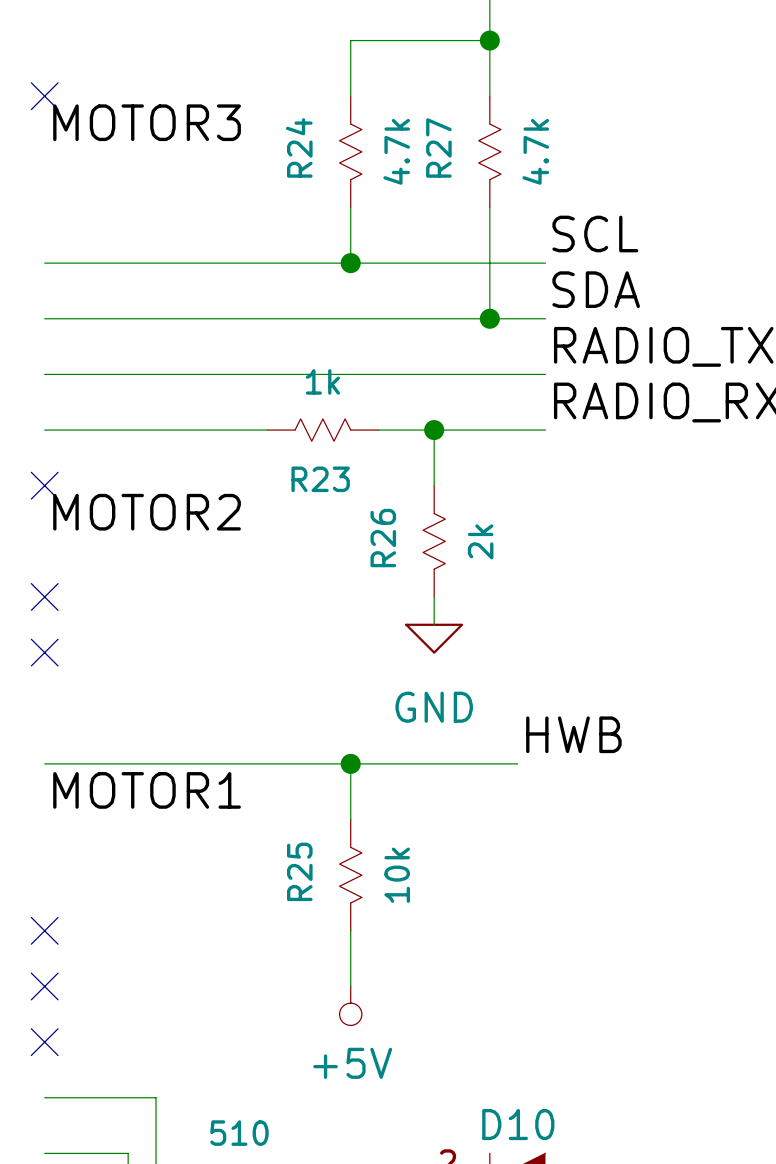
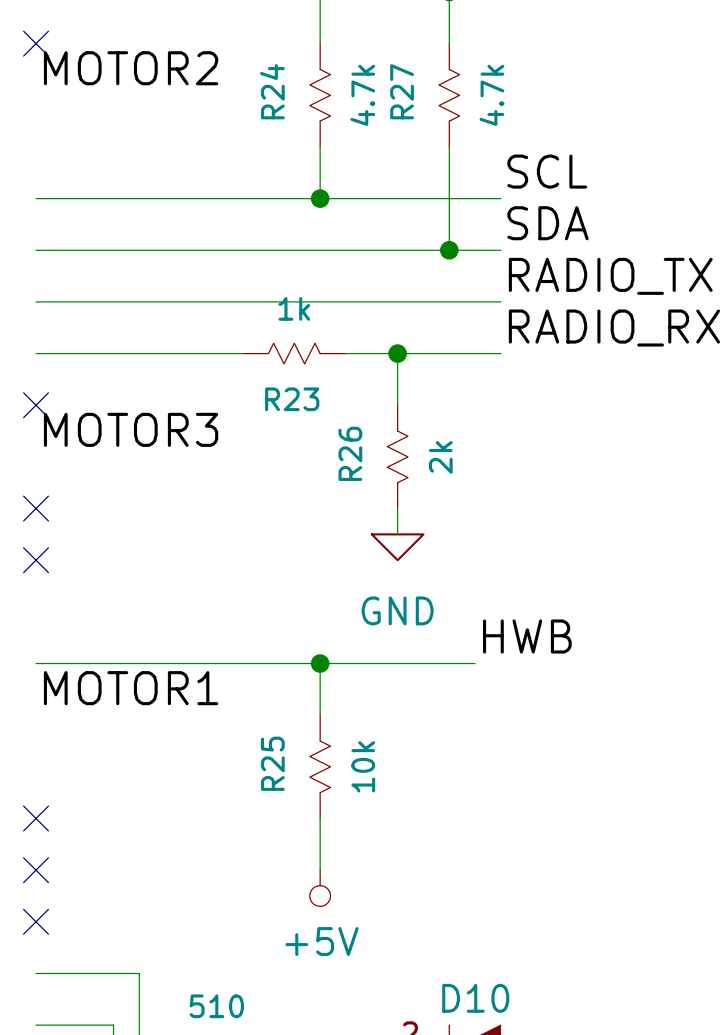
label: MOTOR3 (147, 122) -> MOTOR2 (131, 68)
label: MOTOR2 (147, 512) -> MOTOR3 (131, 429)

